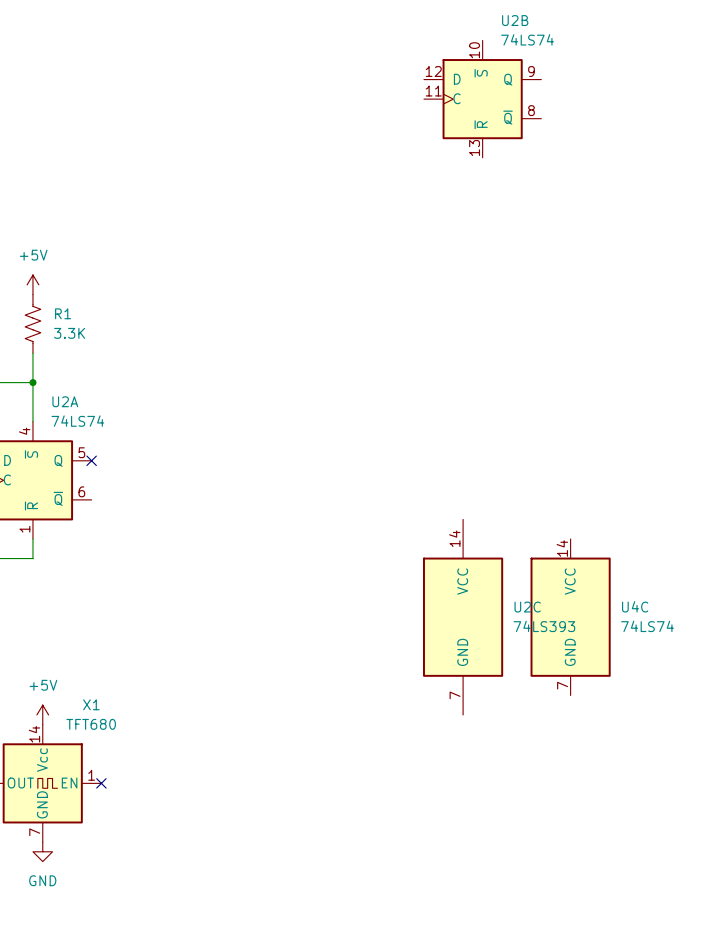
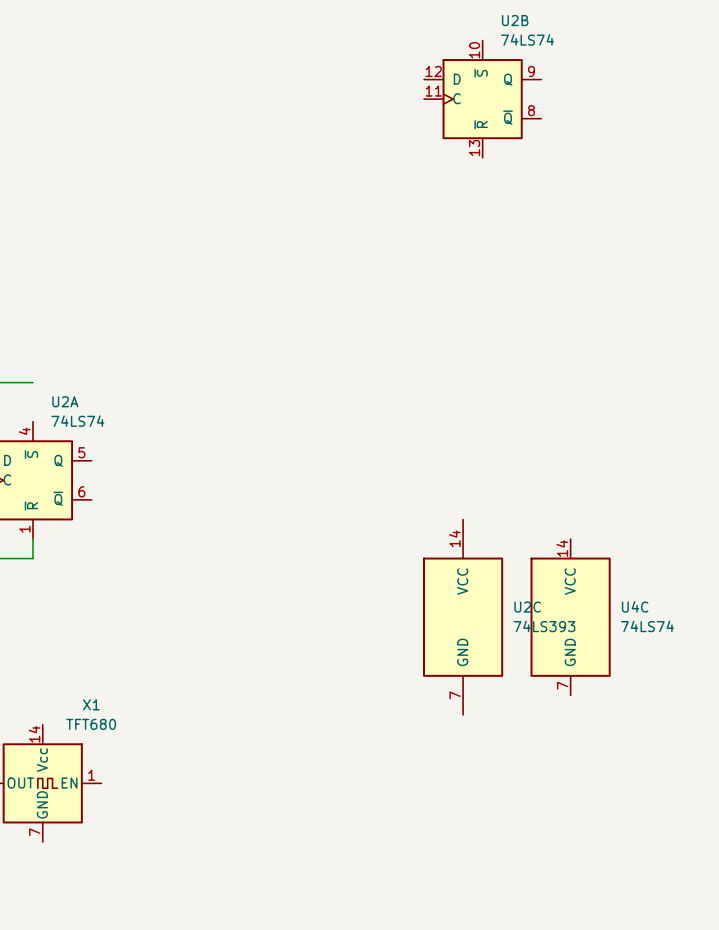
power symbol: +5V (32, 284) -> none
R1: 3.3K (32, 323) -> none
wire: (32, 353) (32, 421) -> none
junction: (32, 382) -> none
no-connect mark: (91, 460) -> none
power symbol: +5V (42, 714) -> none
no-connect mark: (101, 783) -> none
power symbol: GND (42, 851) -> none

